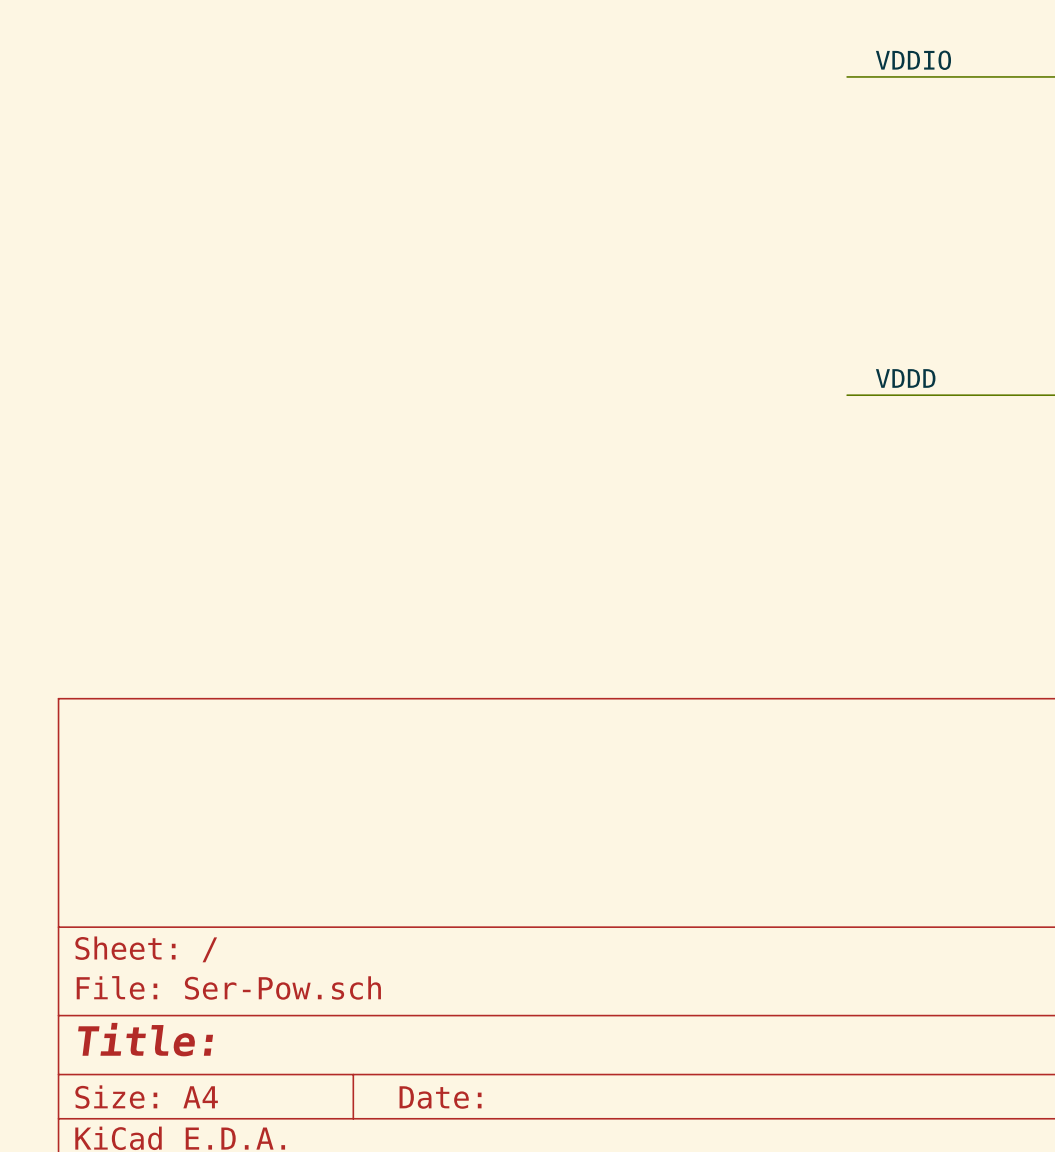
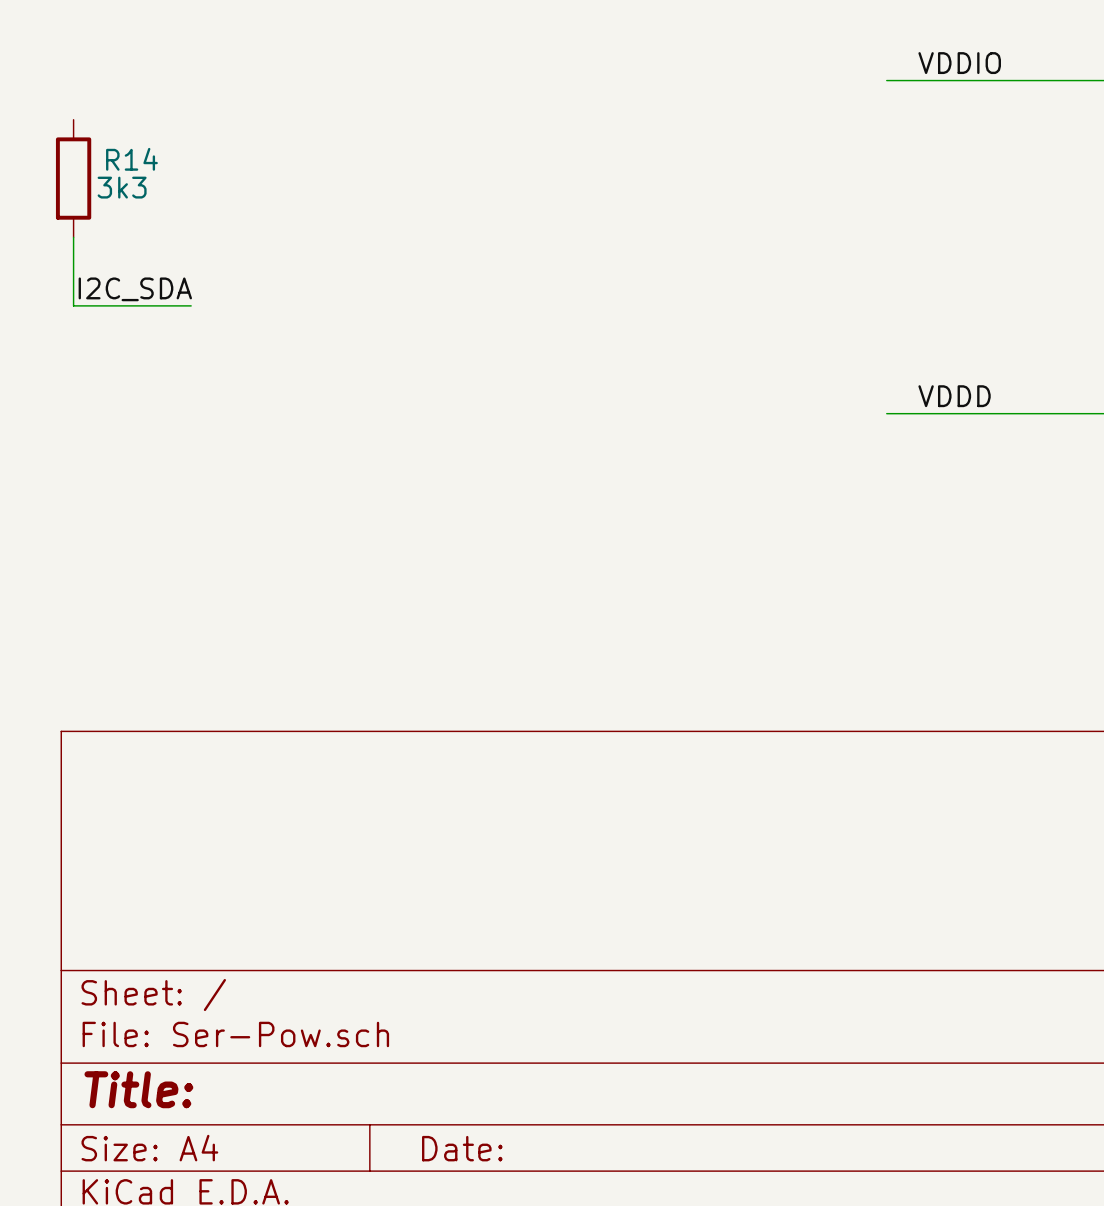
R14: none -> (73, 178)
wire: none -> (73, 237) (73, 305) (191, 305)
label: none -> I2C_SDA (135, 289)

